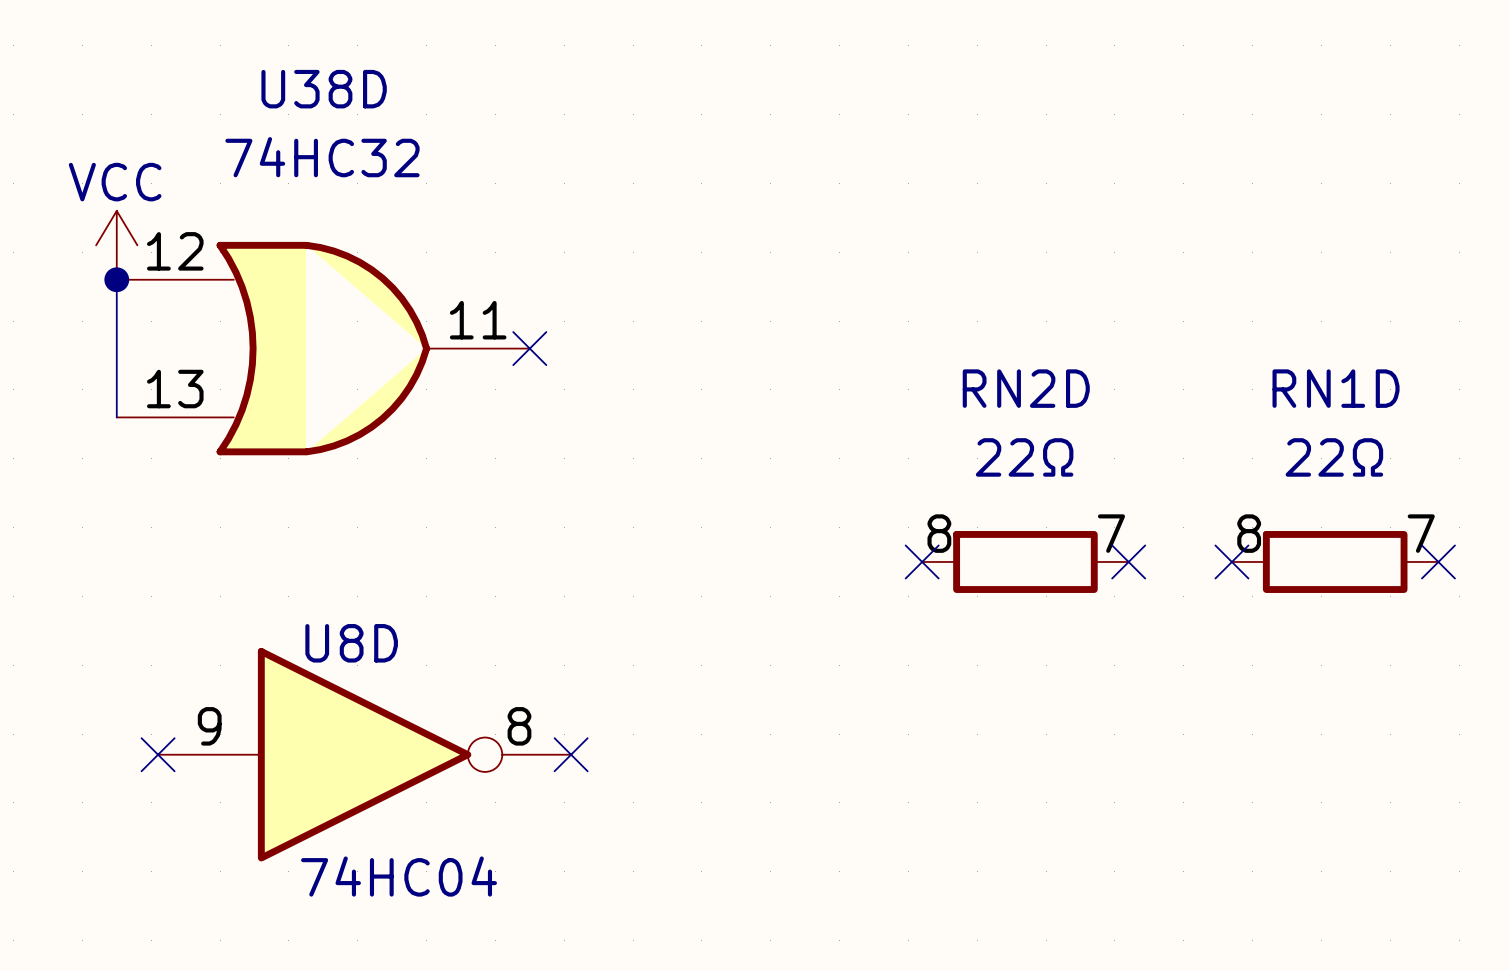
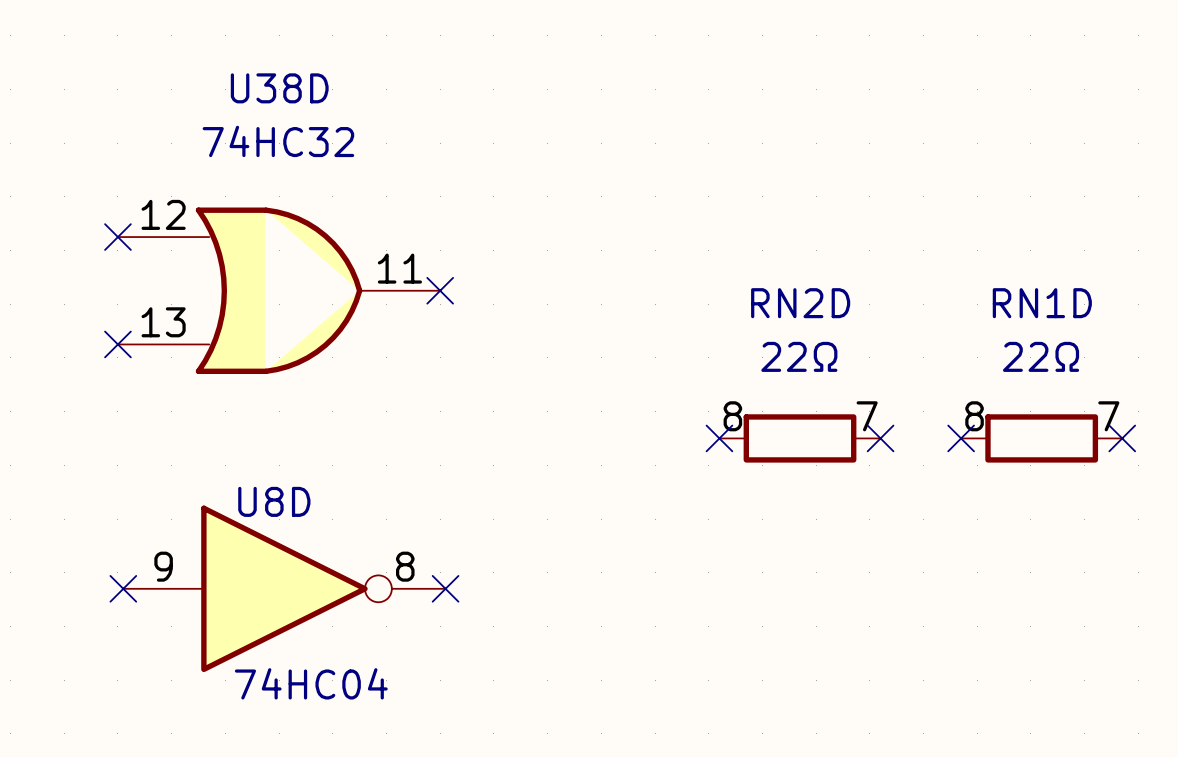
power symbol: VCC (116, 245) -> none
wire: (116, 279) (116, 417) -> none
junction: (116, 279) -> none
no-connect mark: none -> (117, 237)
U38D position: (323, 348) -> (279, 290)
no-connect mark position: (529, 348) -> (440, 290)
no-connect mark: none -> (117, 344)

